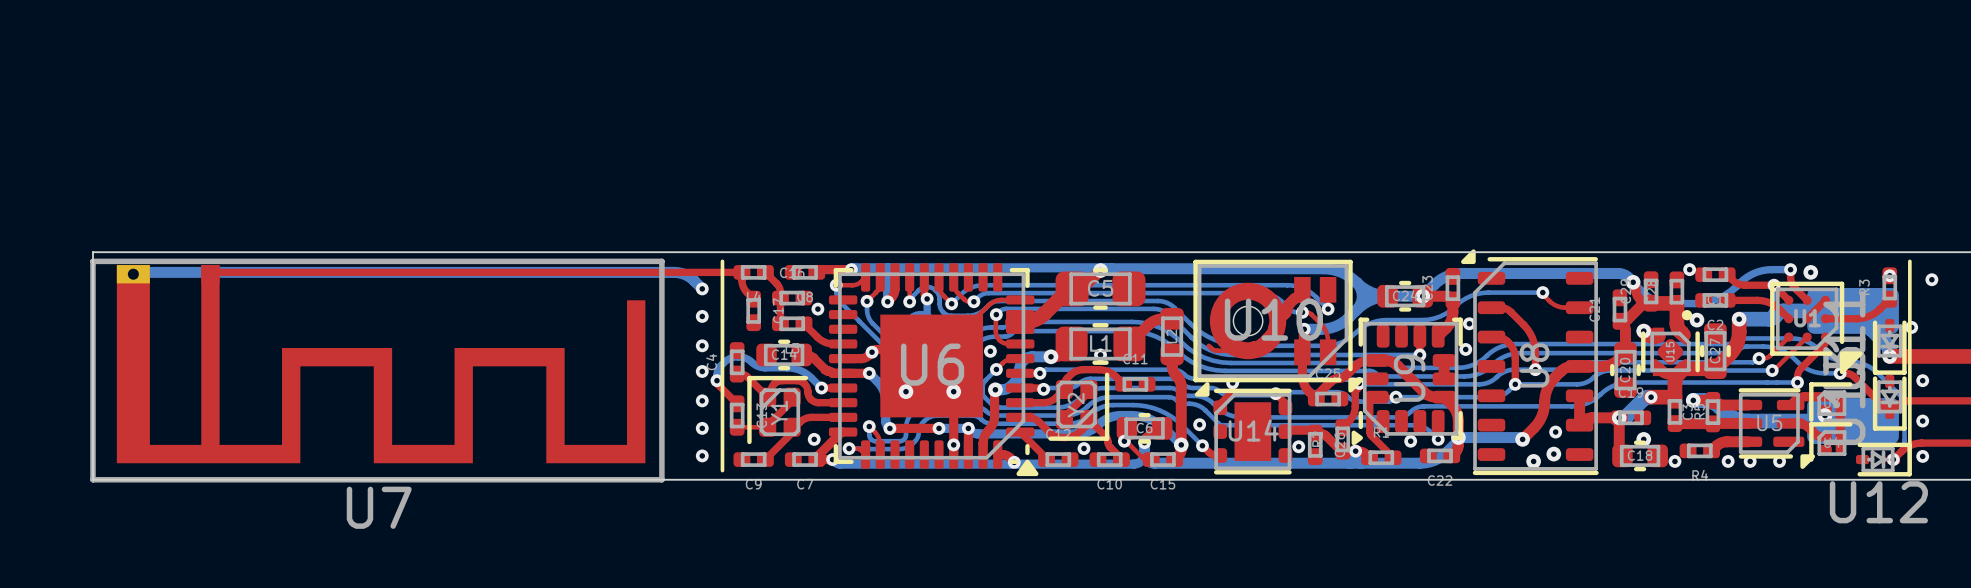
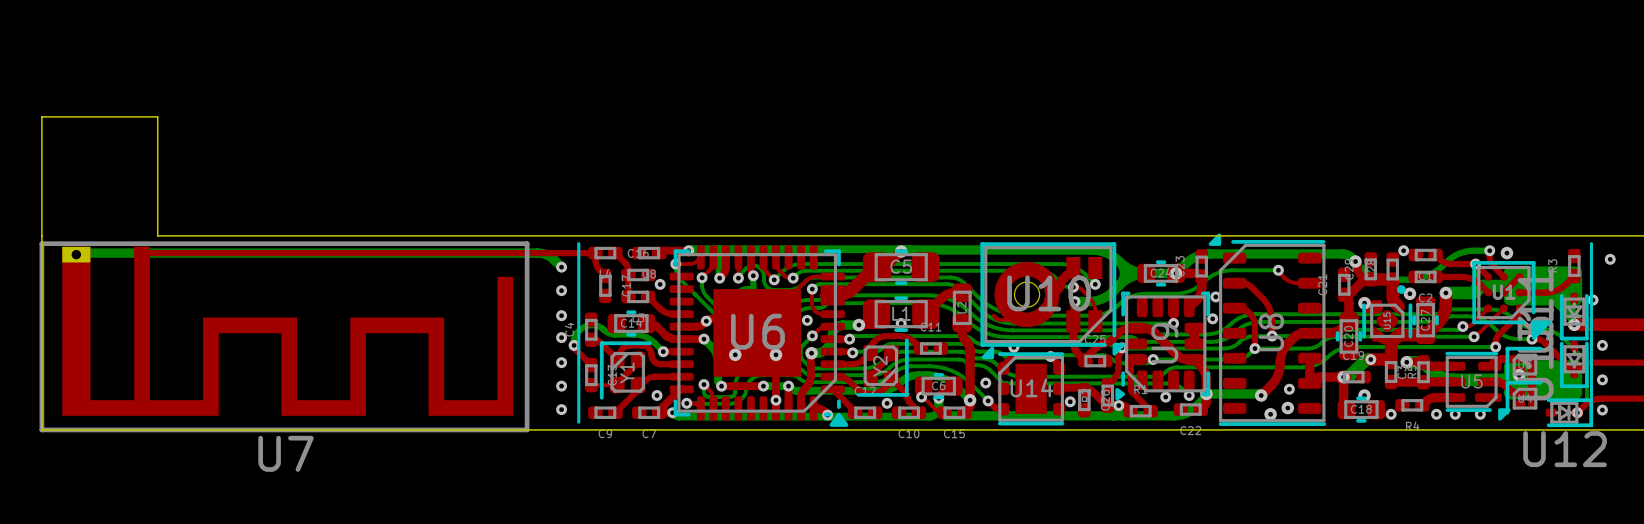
board edge: (92, 252) (228, 252) -> (41, 235) (41, 116) (157, 116) (157, 235)
via: (1889, 275) -> none

